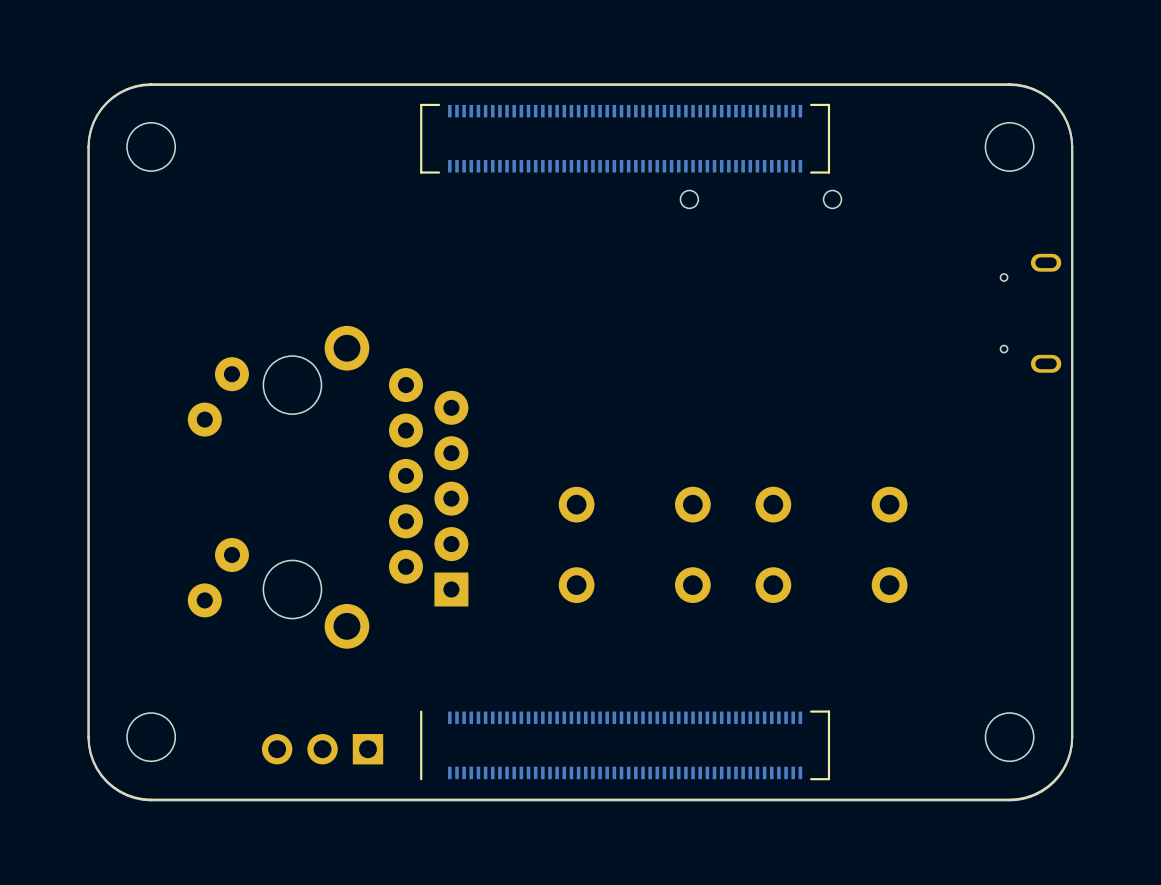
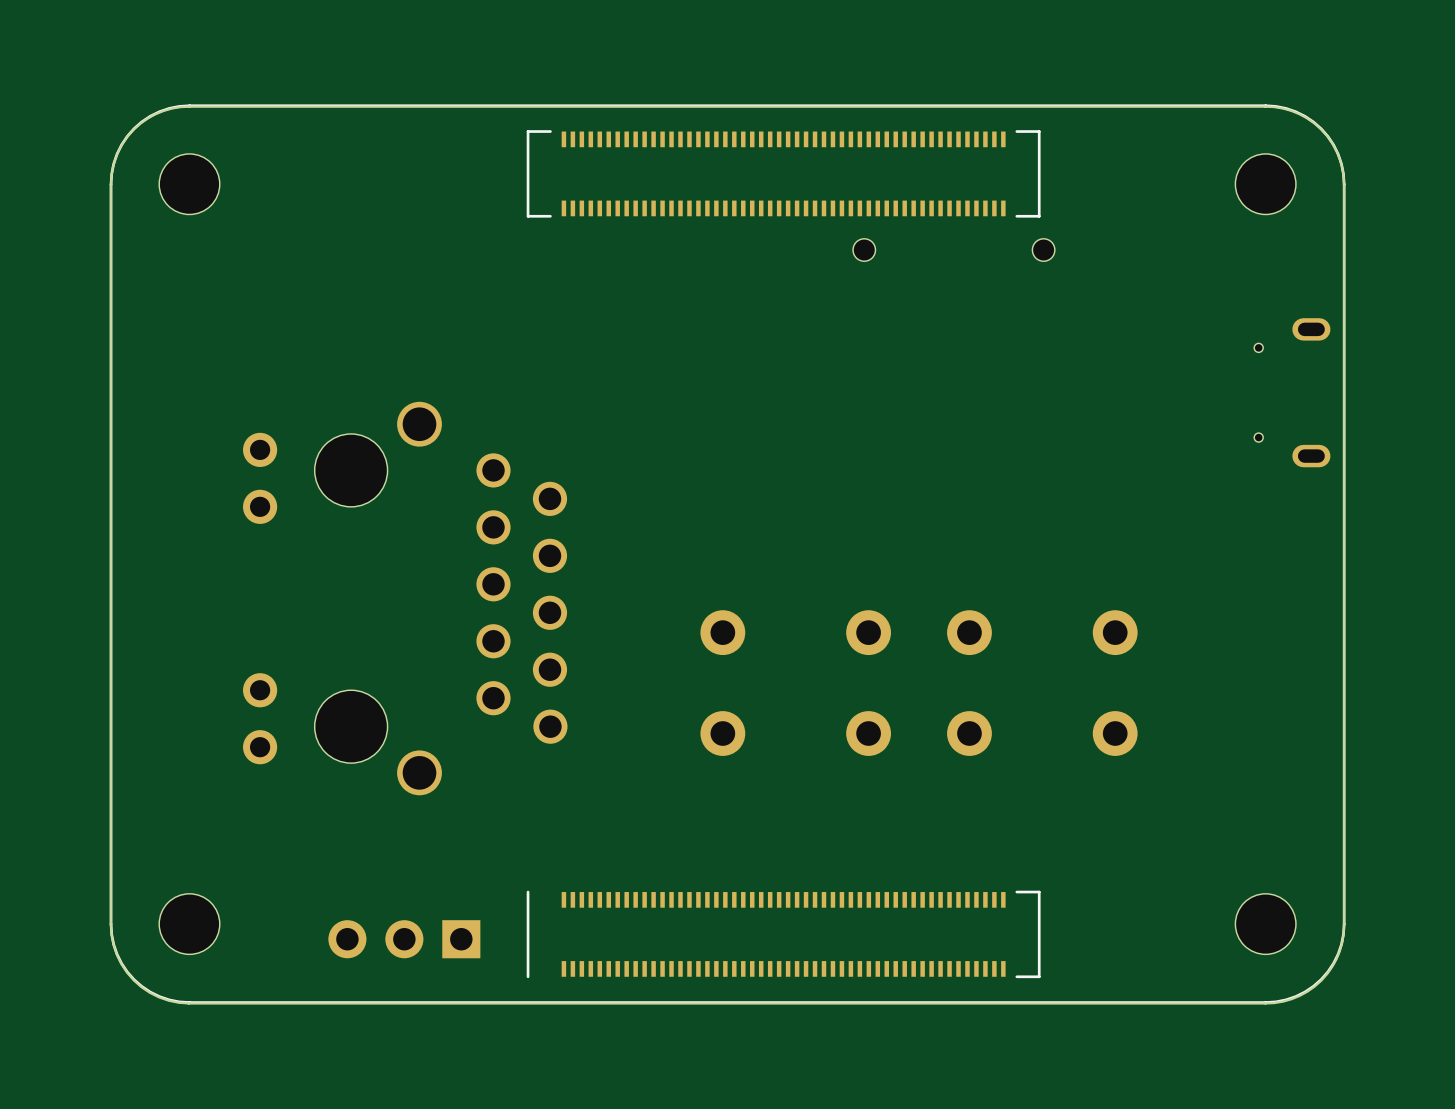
part footprint: [187, 325, 469, 649] -> [243, 401, 568, 796]

